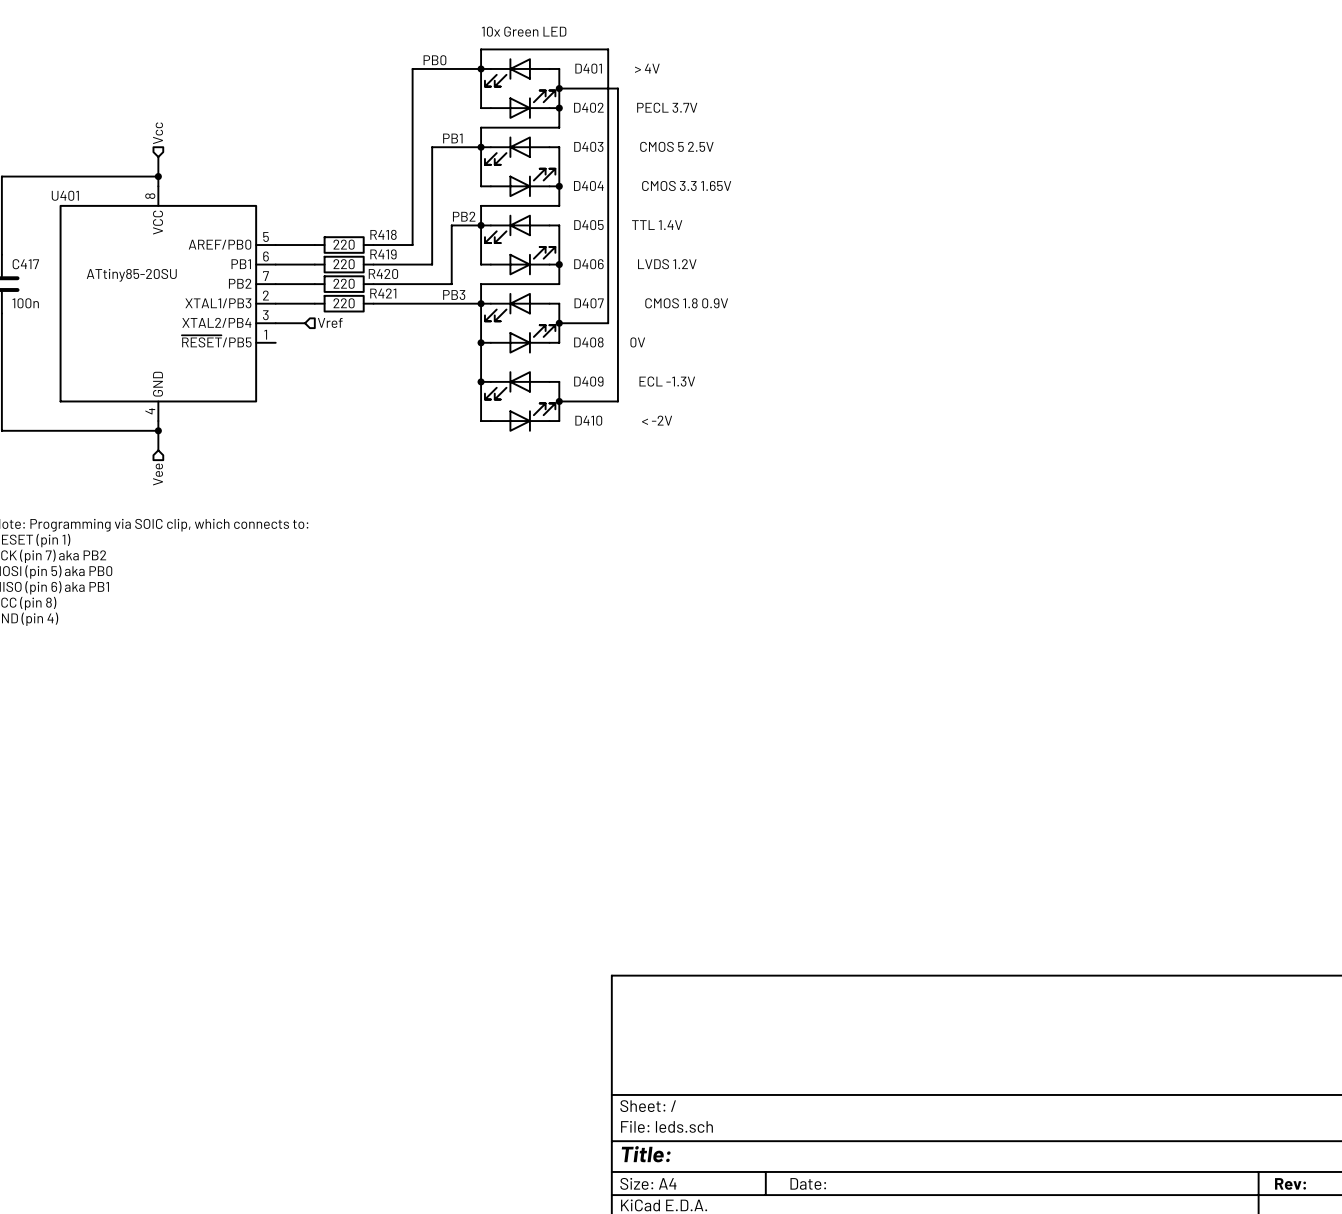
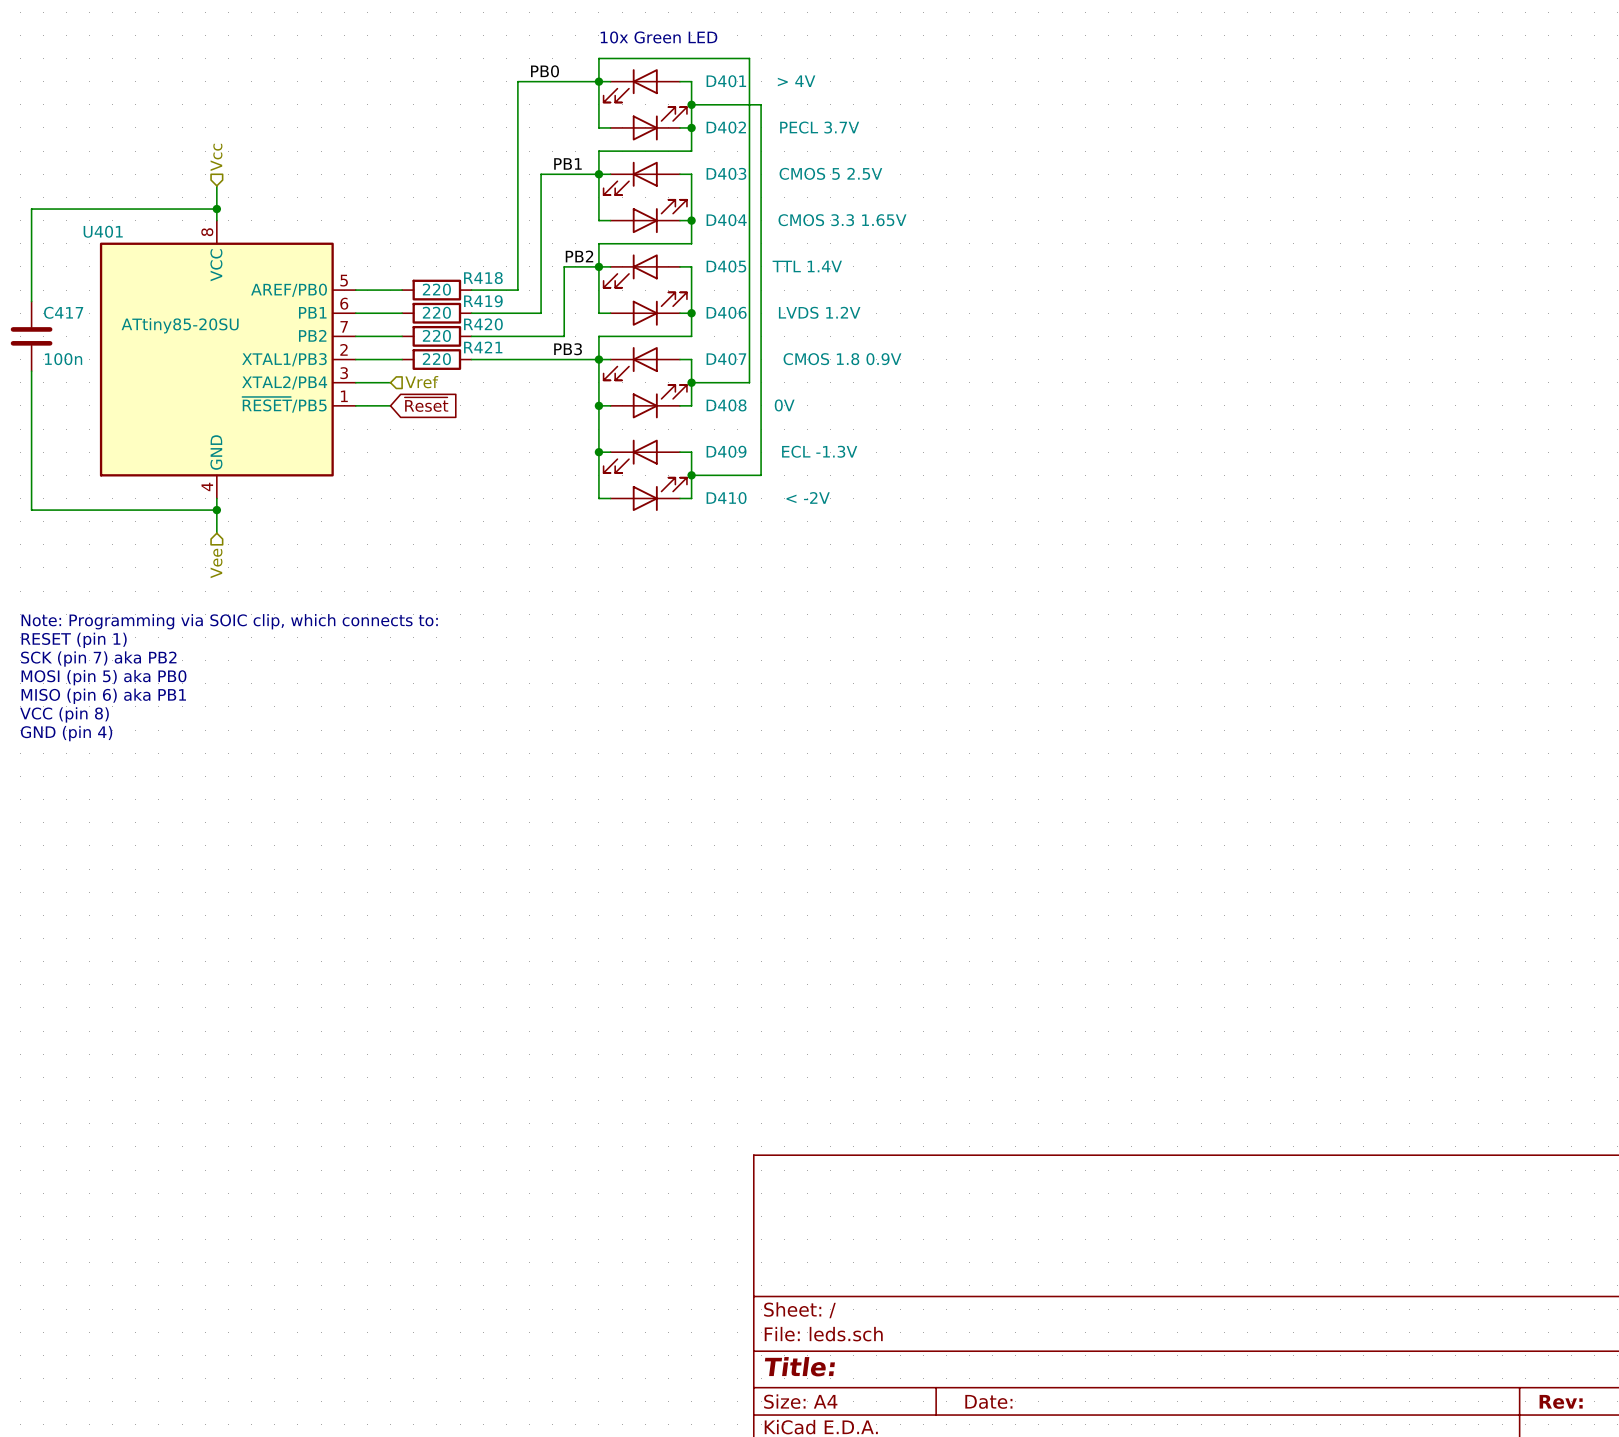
global label: none -> ~{Reset} (426, 404)
wire: none -> (355, 405) (390, 405)

